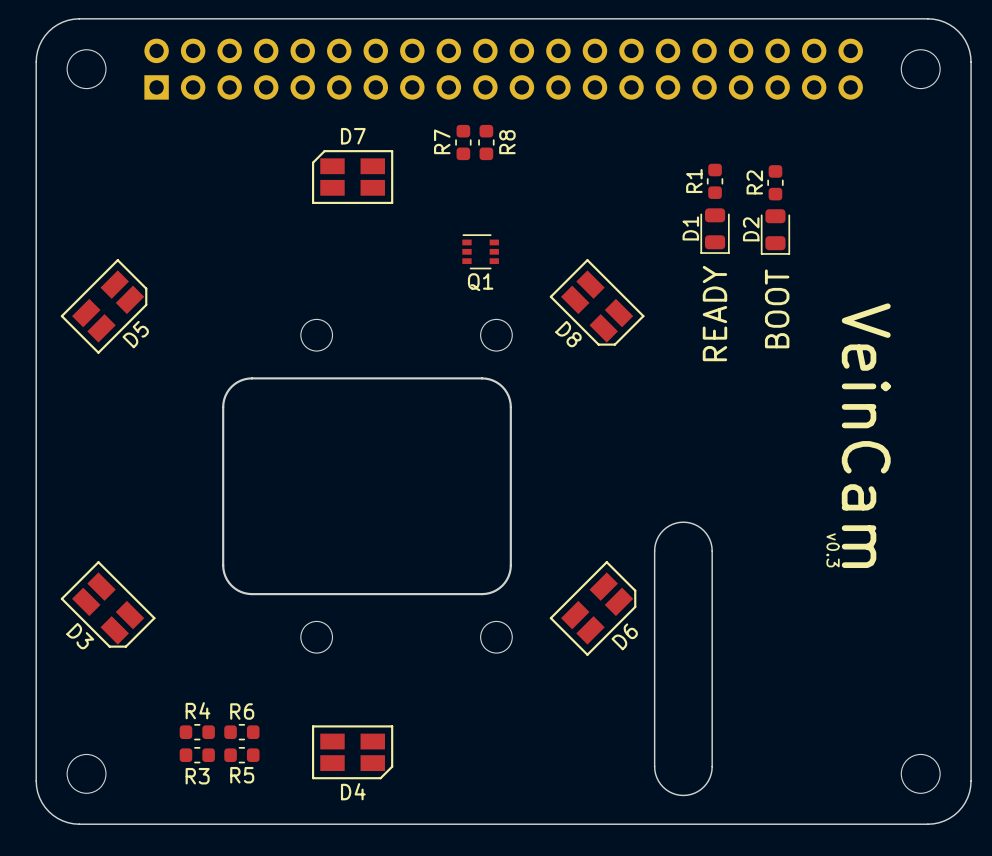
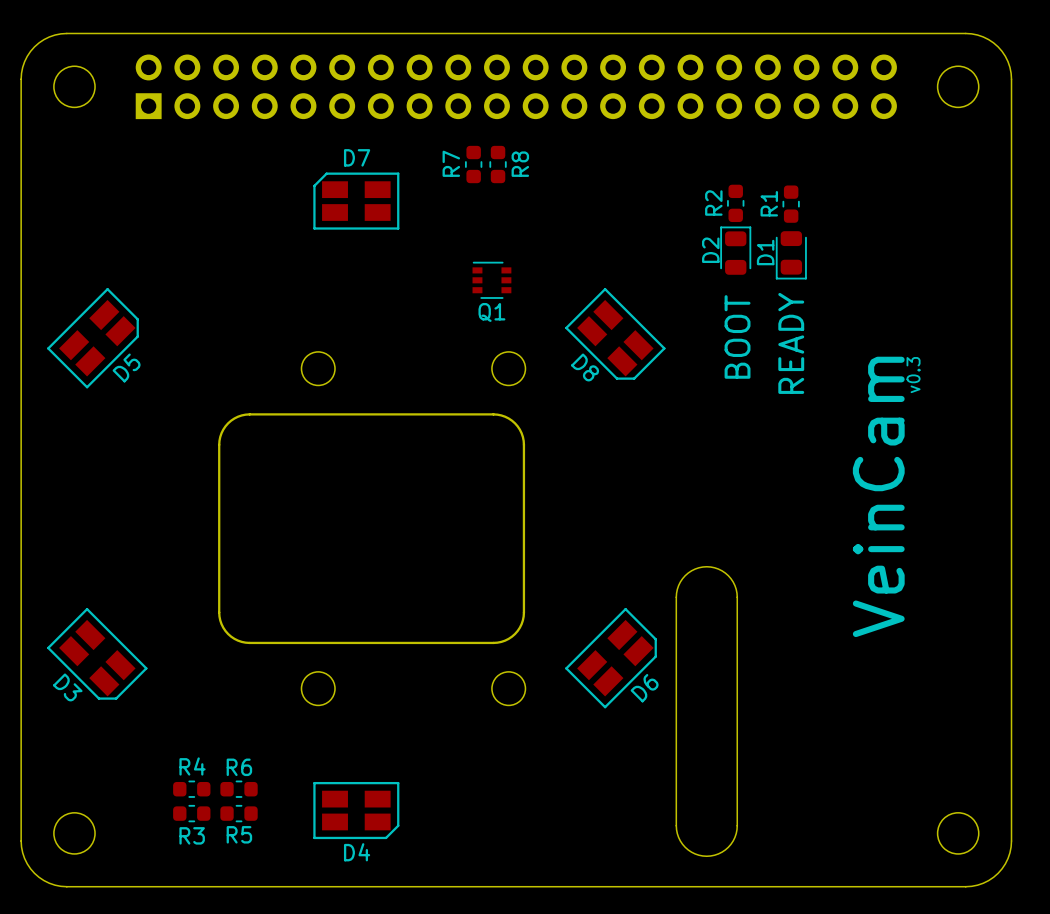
R1 position: (715, 181) -> (791, 204)
R2 position: (775, 182) -> (735, 203)
D1 position: (715, 231) -> (791, 255)
D2 rotation: 0° (775, 232) -> 180° (735, 250)
D2 position: (775, 232) -> (735, 250)
text position: BOOT (777, 308) -> BOOT (737, 336)
text position: READY (714, 313) -> READY (791, 343)
text rotation: 0° (866, 435) -> 180° (878, 496)
text rotation: 0° (833, 550) -> 180° (913, 375)
text position: v0.3 (833, 550) -> v0.3 (913, 375)

